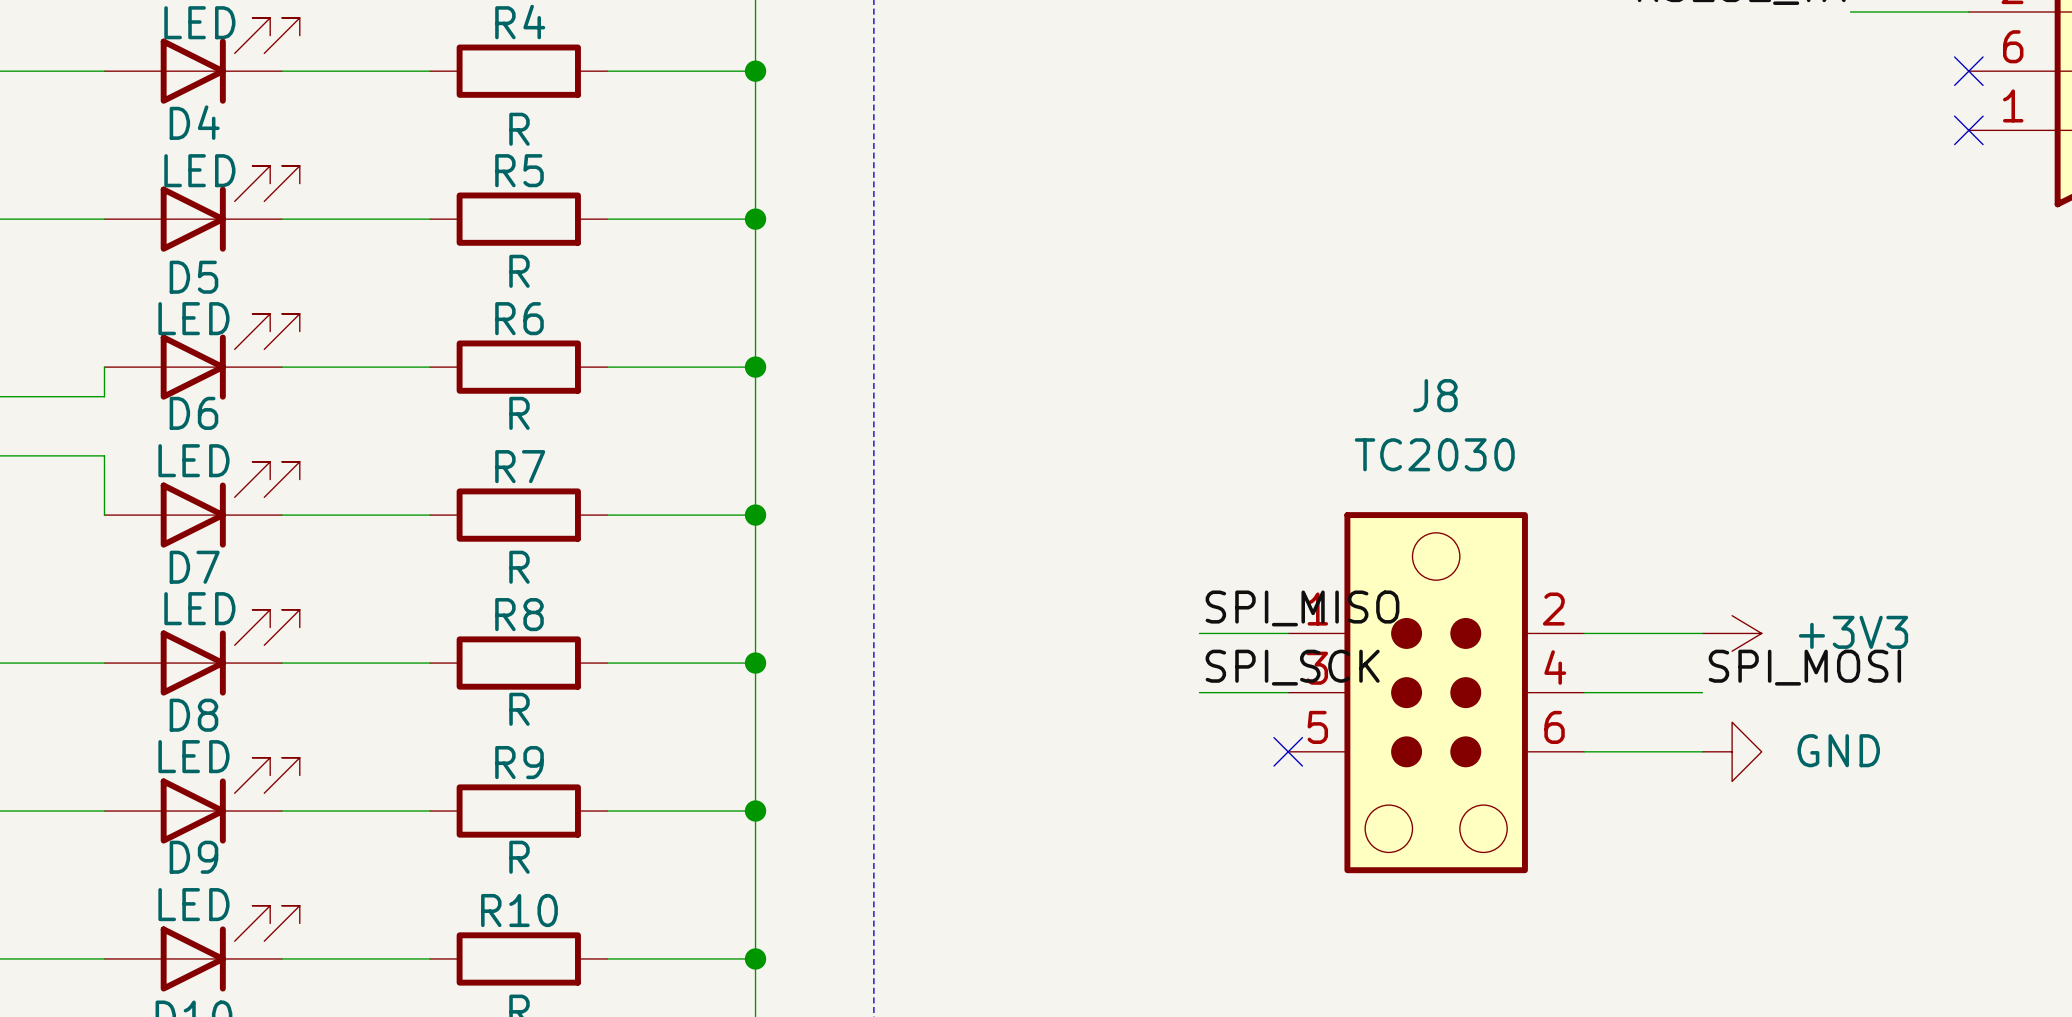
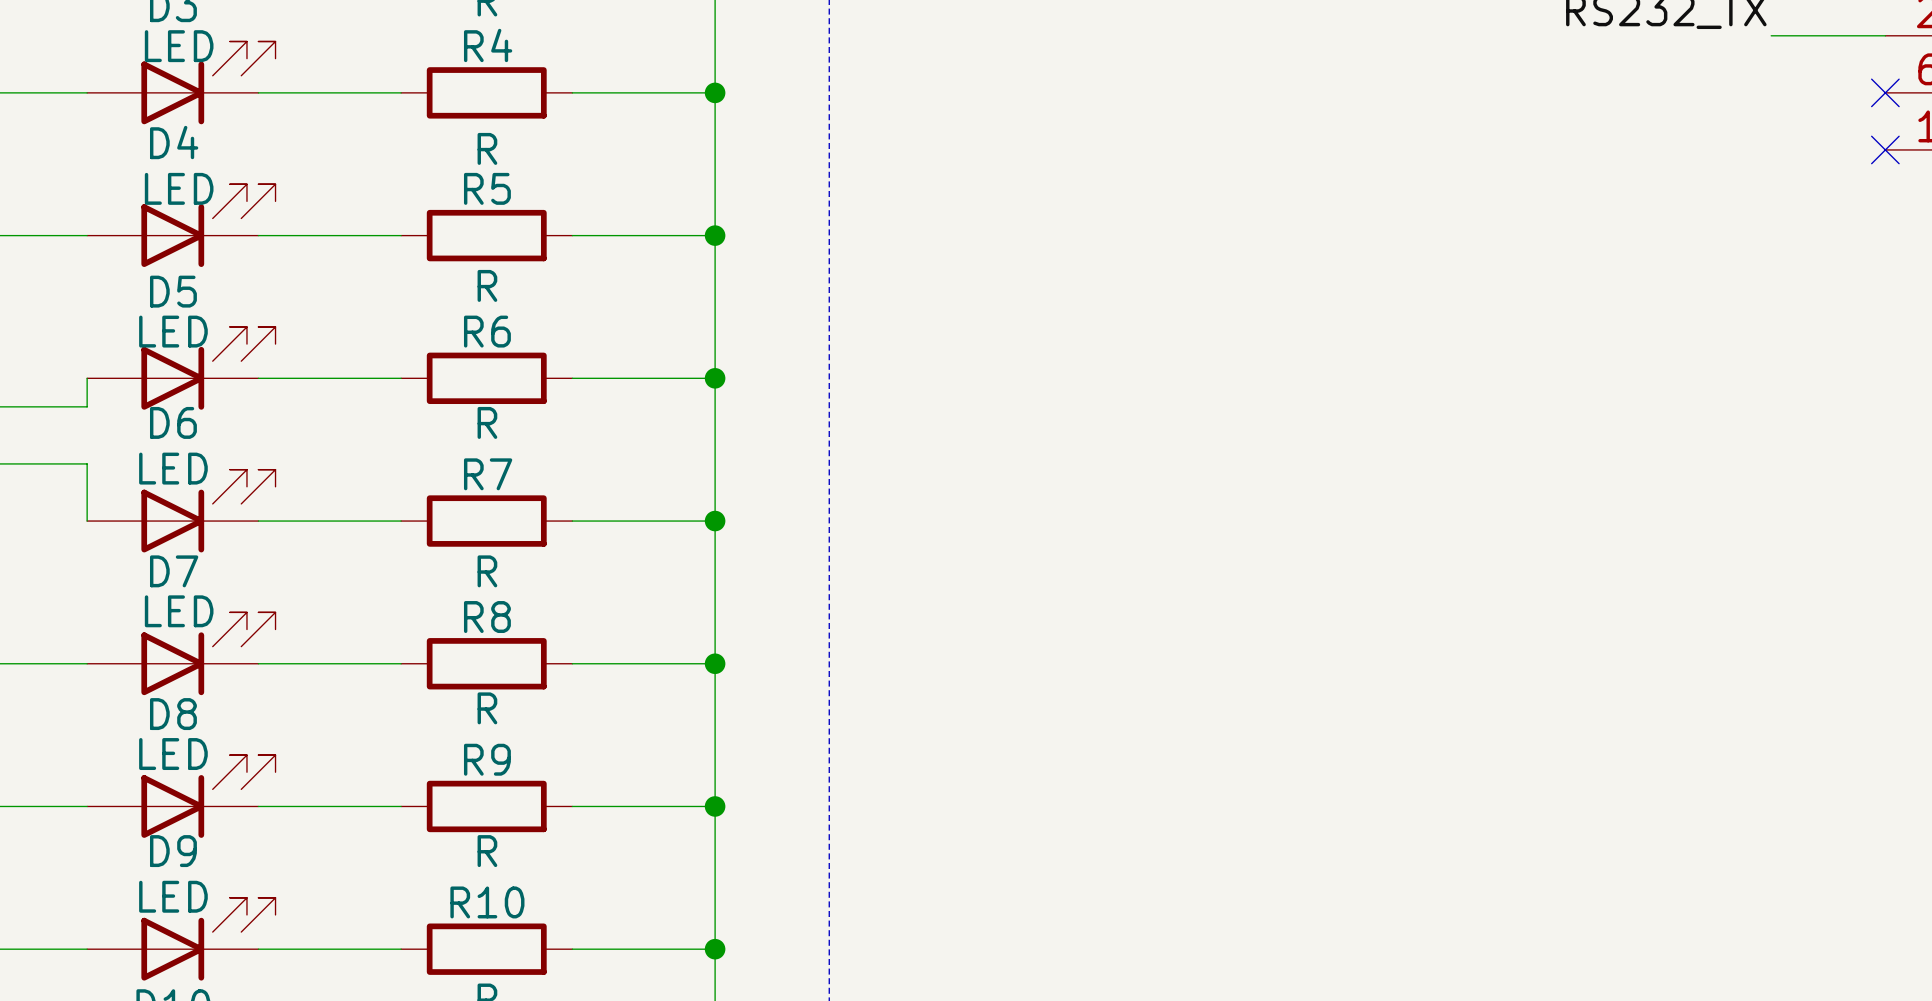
label: SPI_MISO (1302, 608) -> none
wire: (1199, 633) (1288, 633) -> none
wire: (1584, 633) (1702, 633) -> none
power symbol: +3V3 (1732, 633) -> none
label: SPI_SCK (1292, 667) -> none
label: SPI_MOSI (1804, 667) -> none
wire: (1199, 692) (1288, 692) -> none
J8: TC2030 (1436, 692) -> none
wire: (1584, 692) (1702, 692) -> none
no-connect mark: (1288, 751) -> none
wire: (1584, 751) (1702, 751) -> none
power symbol: GND (1732, 751) -> none

